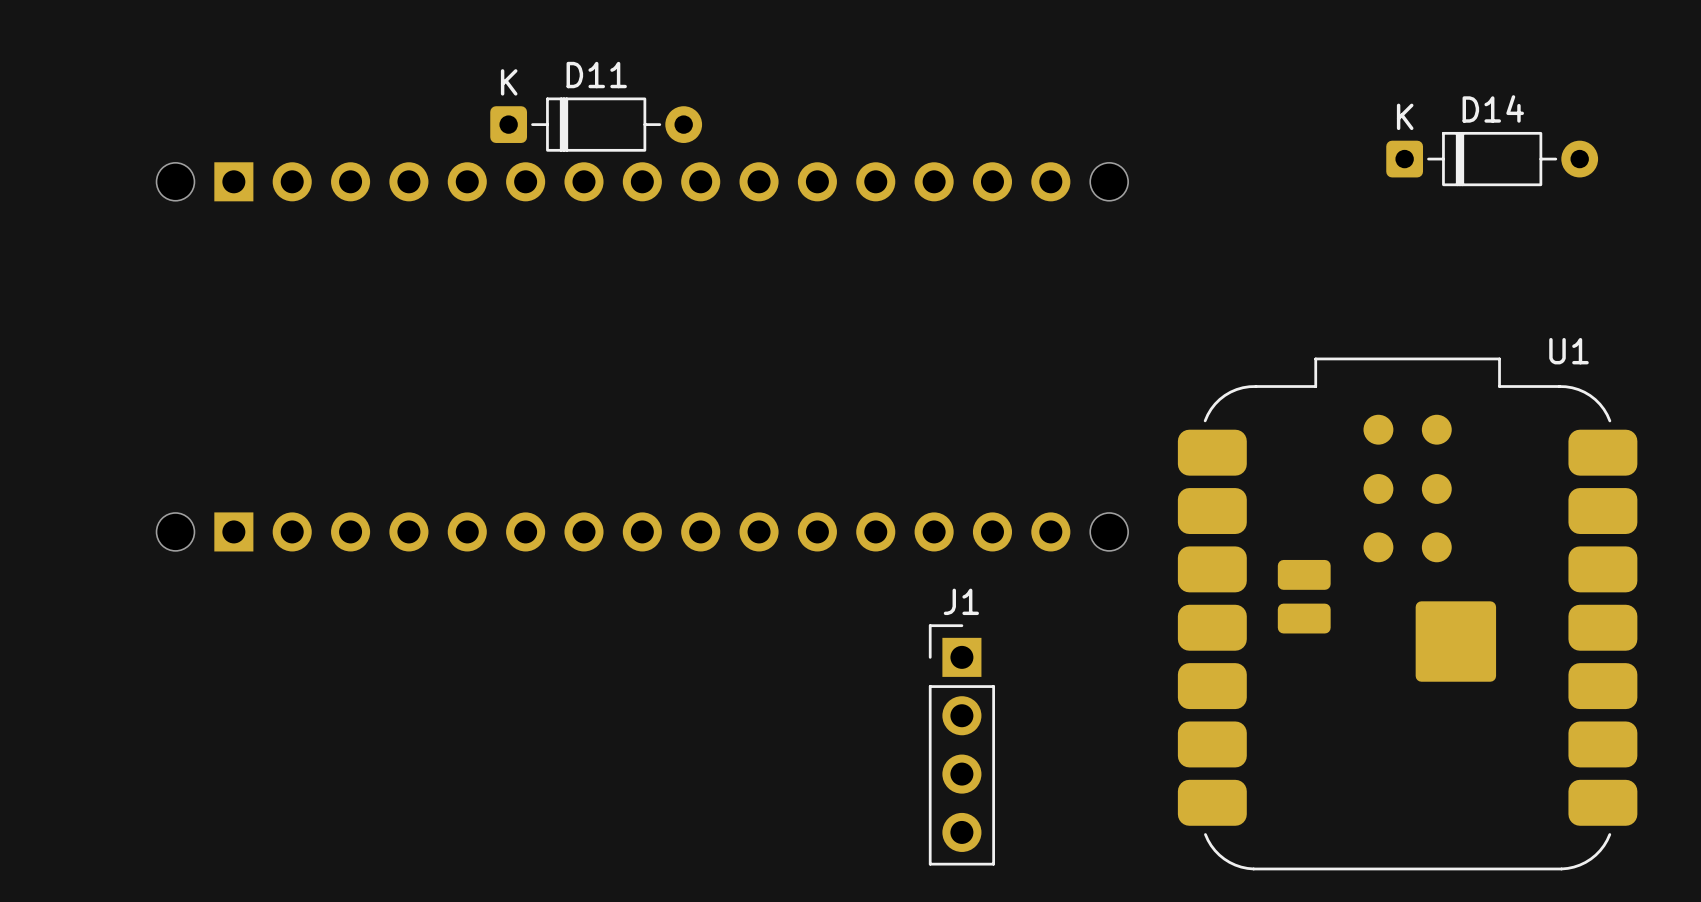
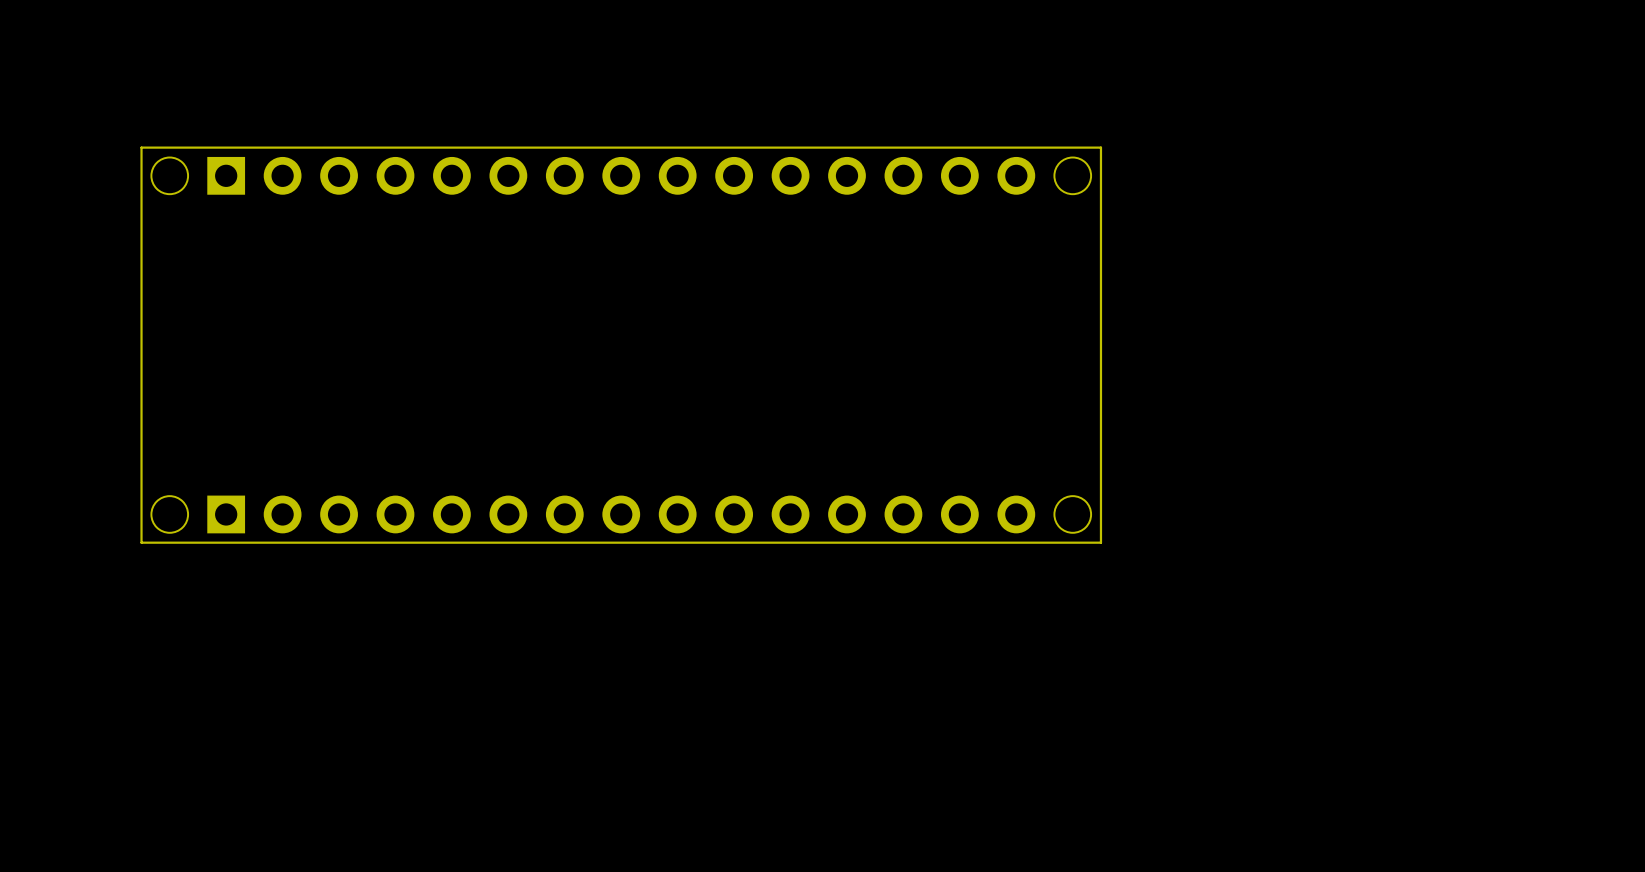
D11: (596, 124) -> none
board edge: none -> (141, 147) (1100, 147) (1100, 542) (141, 542) (141, 147)
D14: (1492, 159) -> none
U1: (1407, 613) -> none
J1: (961, 744) -> none

